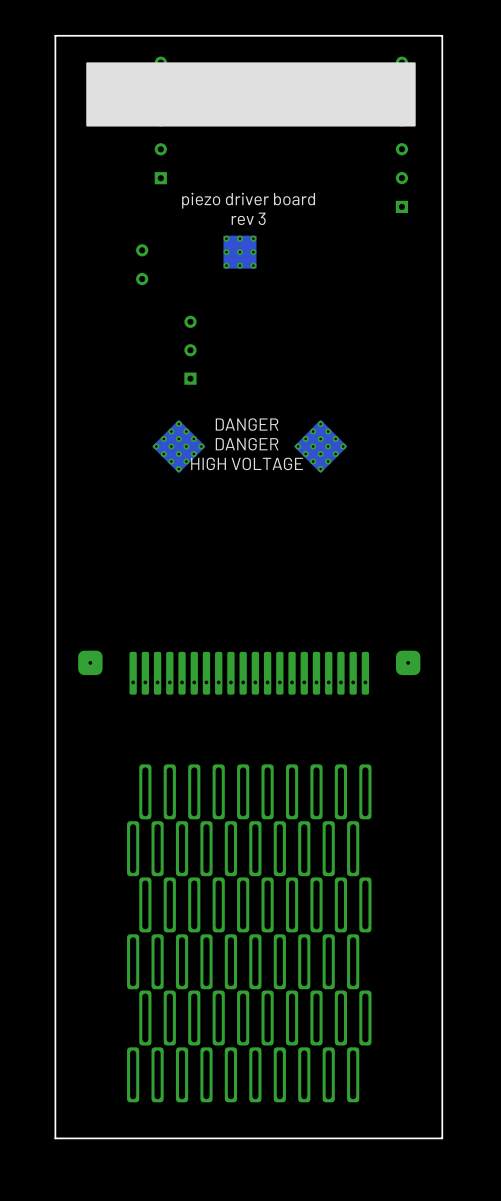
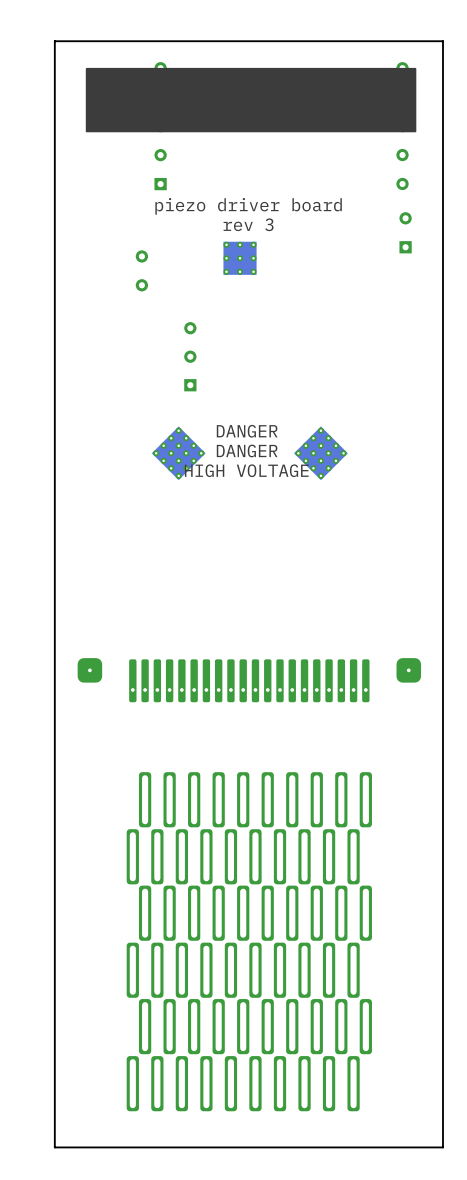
part footprint: [395, 200, 409, 214] -> [399, 212, 412, 225]
part: none -> (405, 247)

